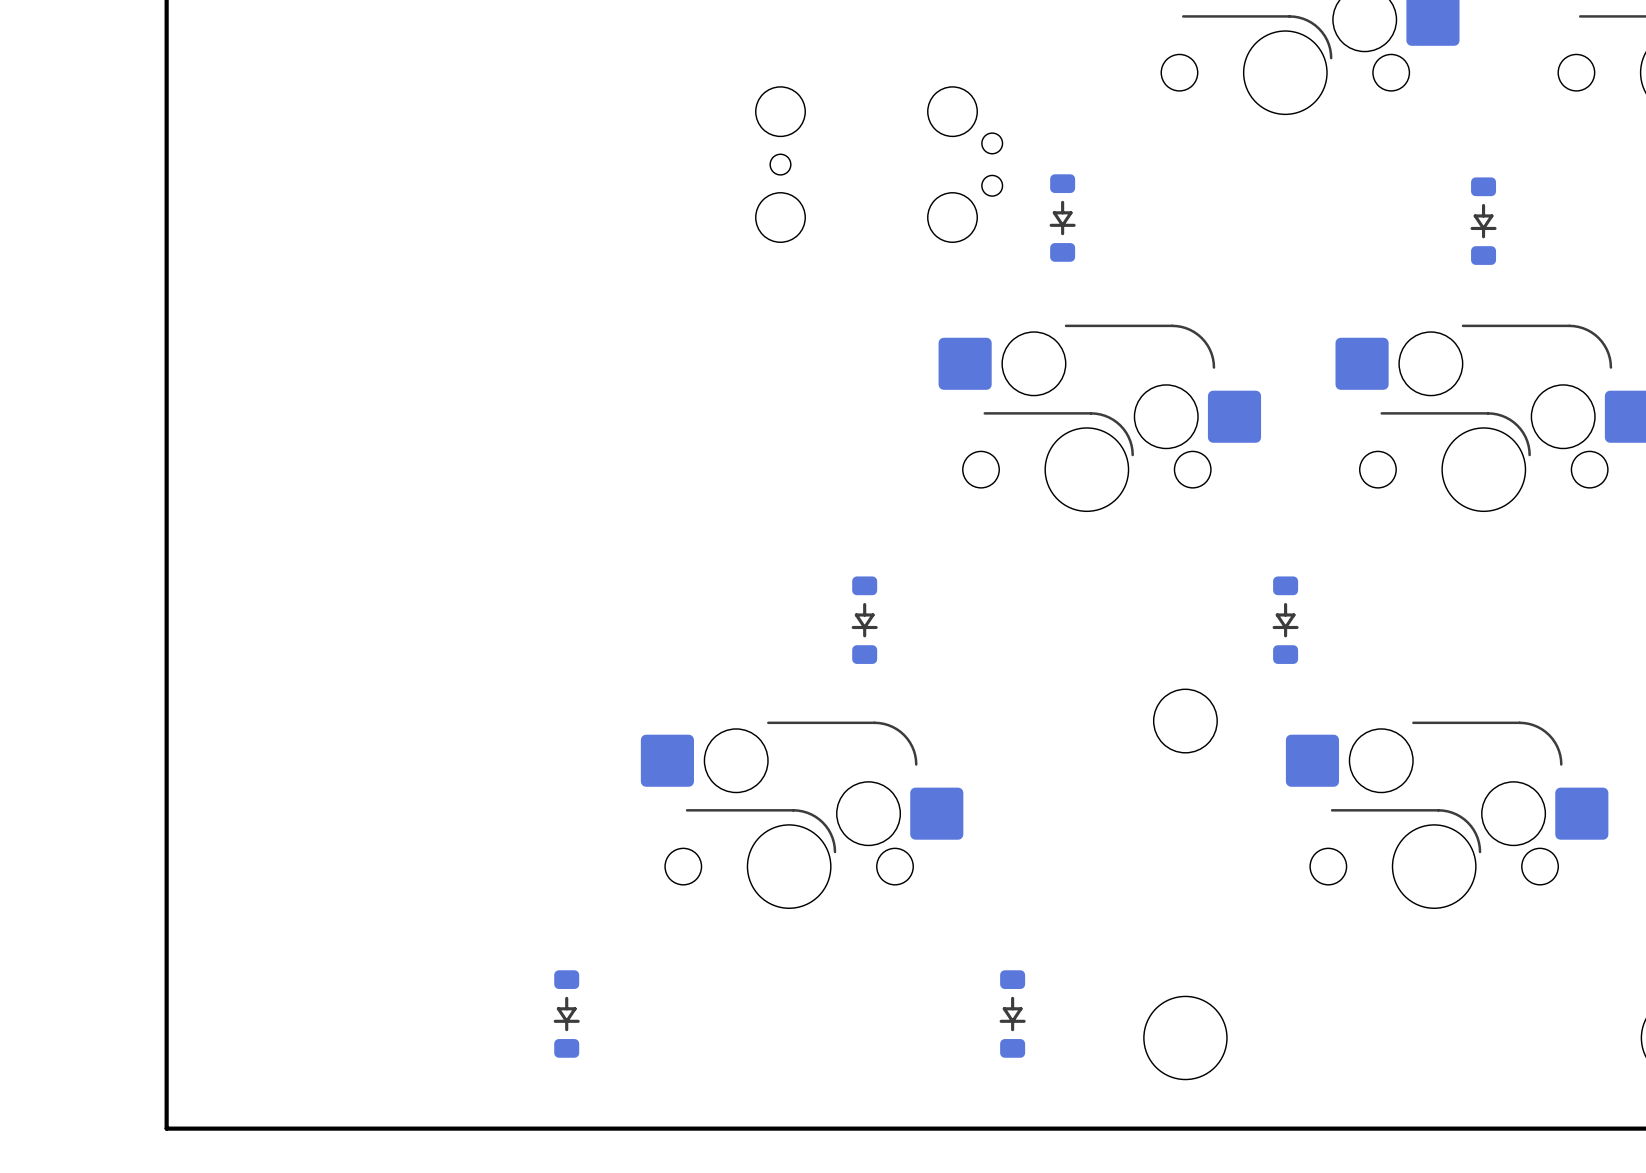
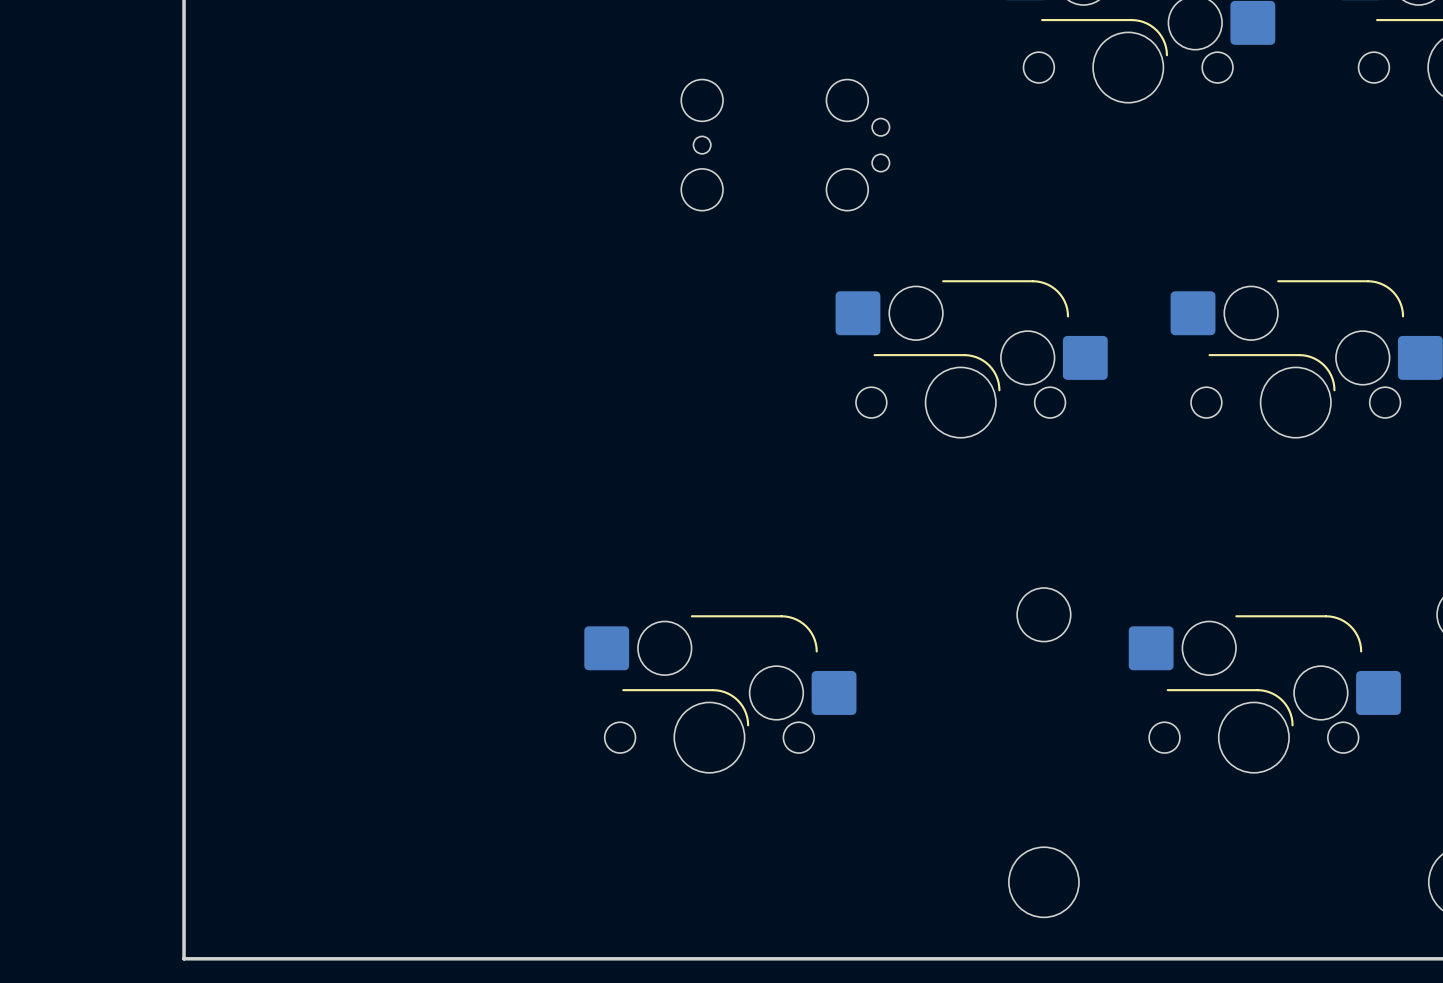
part: (1062, 218) -> none
part: (1483, 221) -> none
part: (864, 620) -> none
part: (1285, 620) -> none
part: (566, 1014) -> none
part: (1012, 1014) -> none

